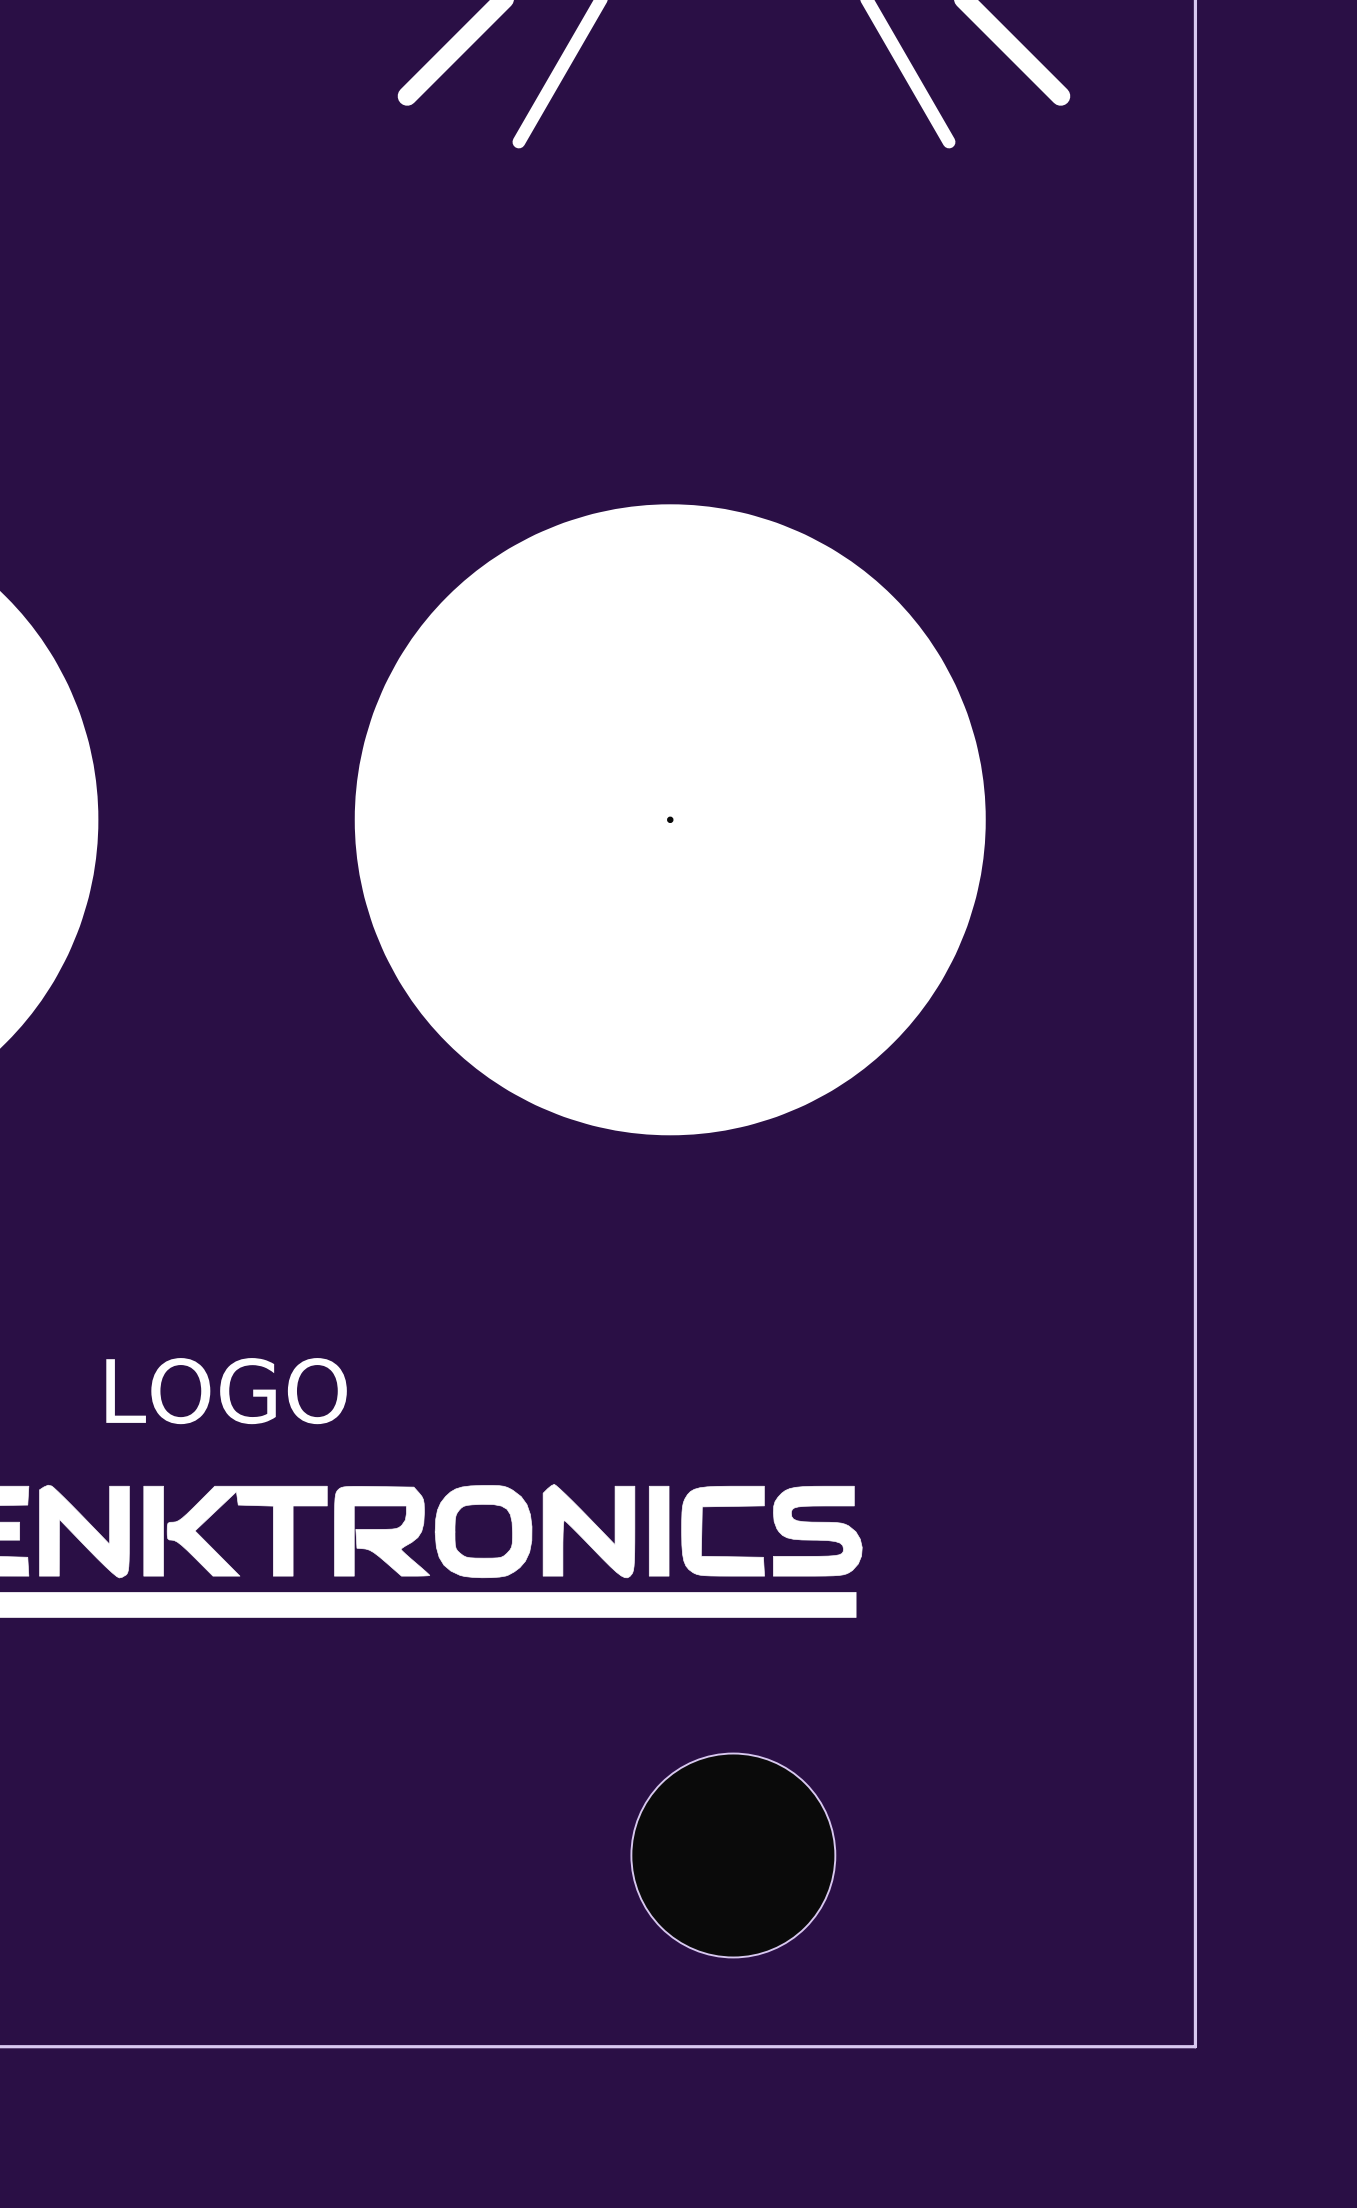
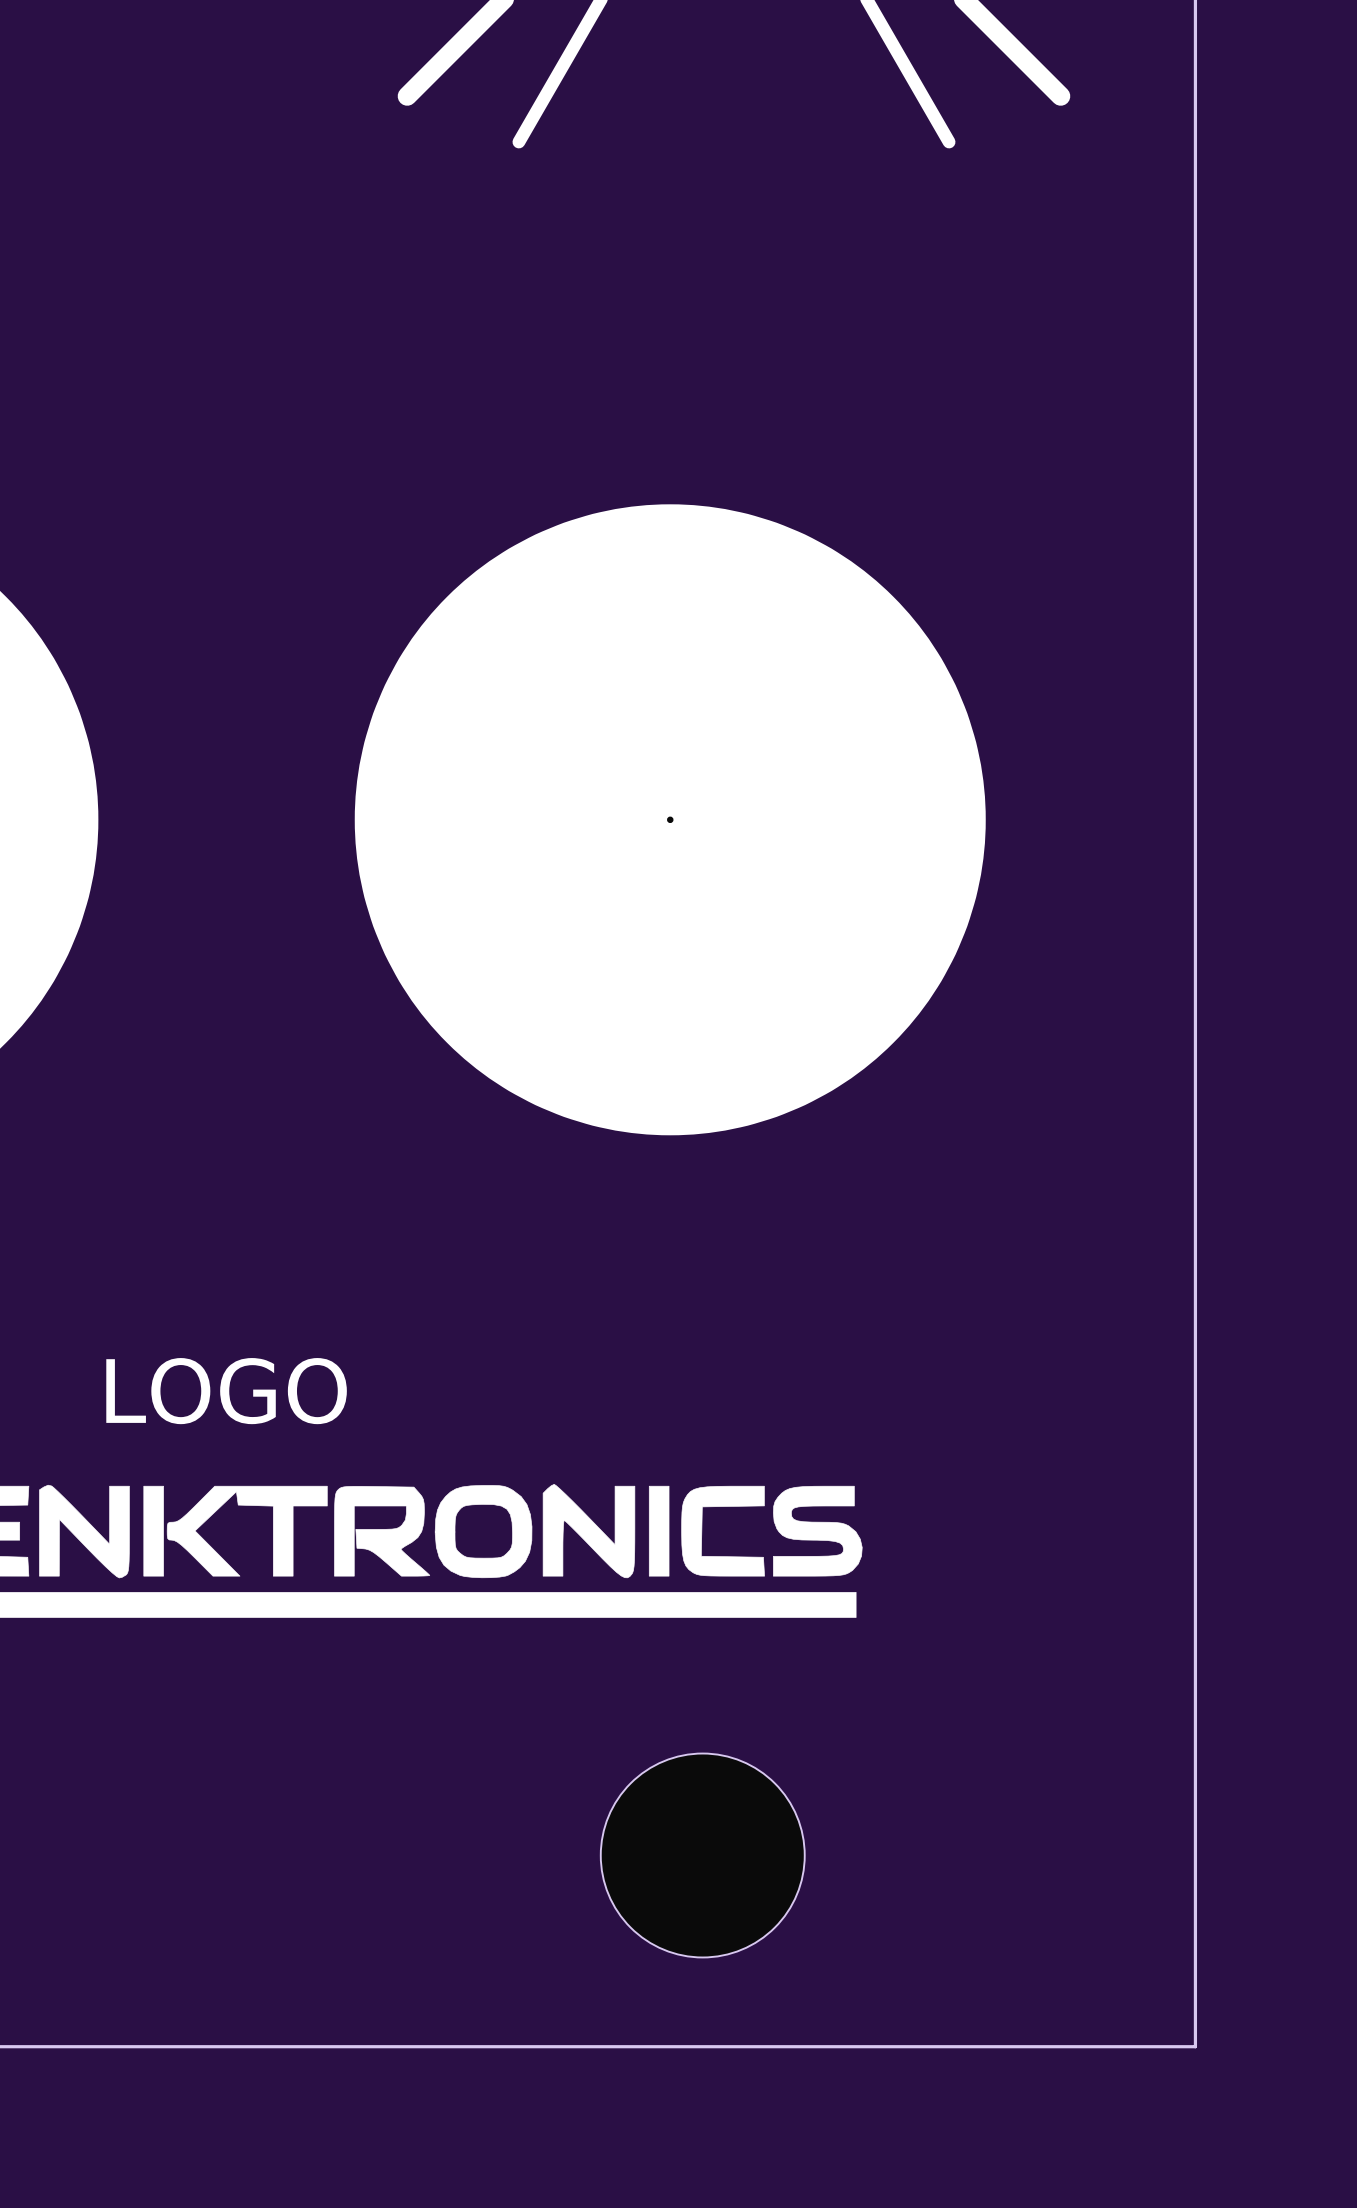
part position: (733, 1855) -> (702, 1855)

